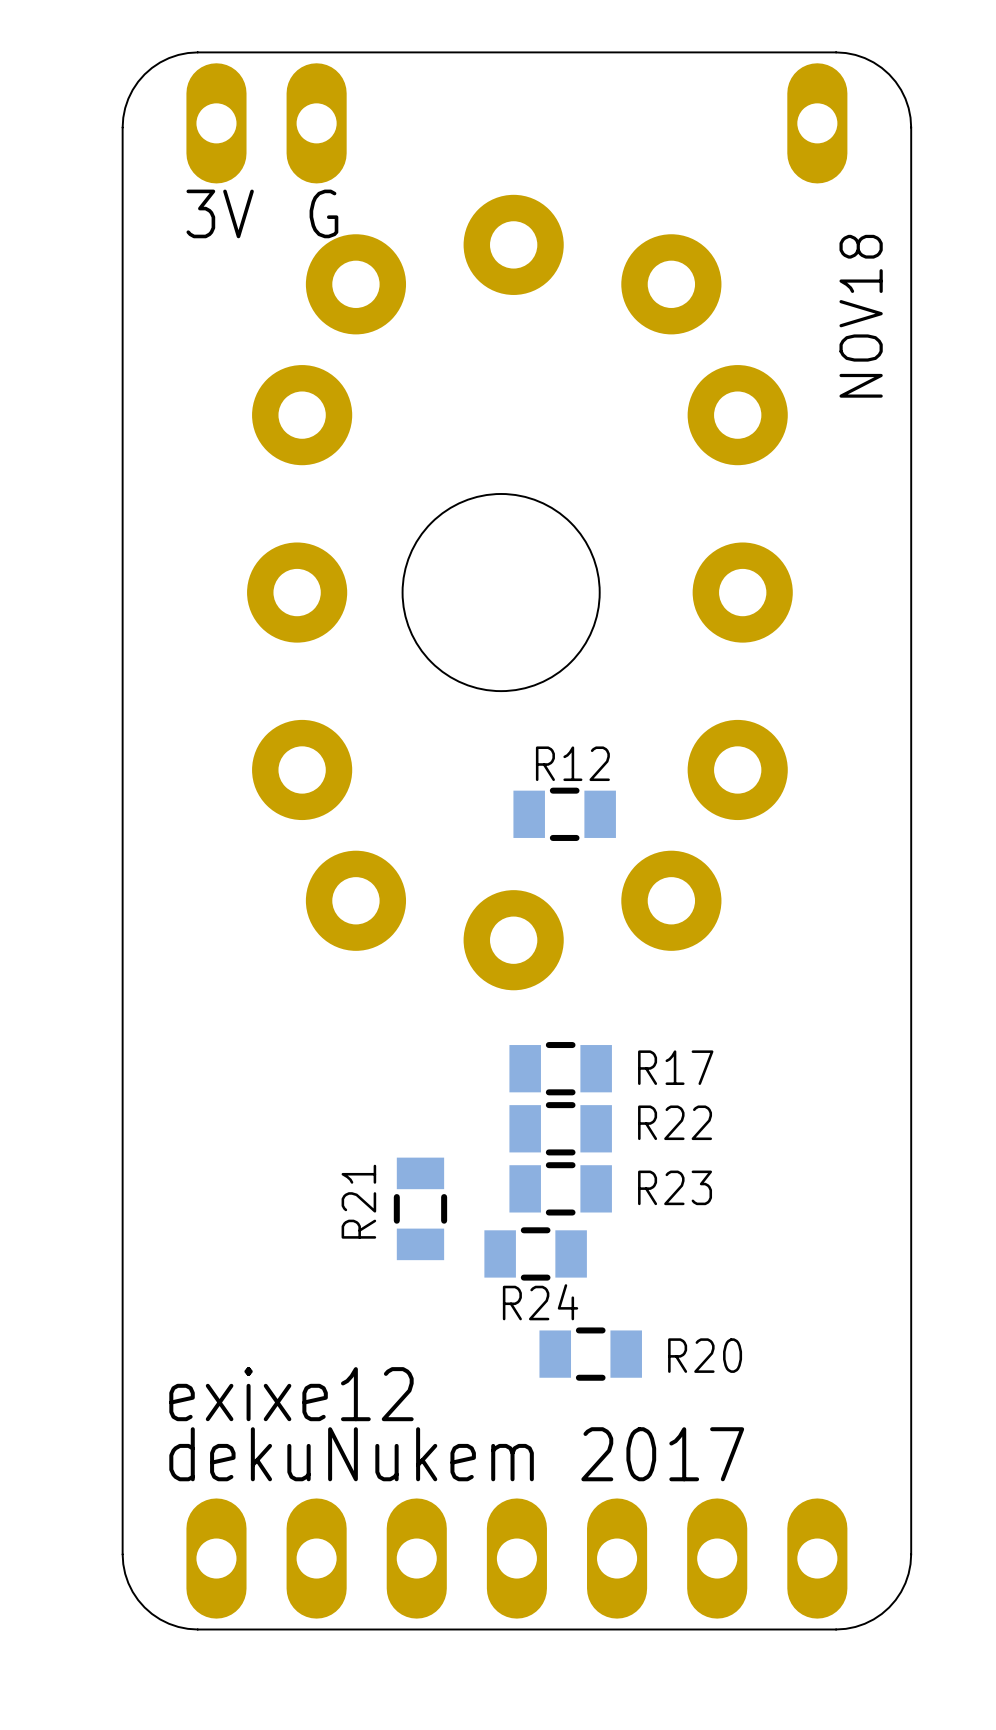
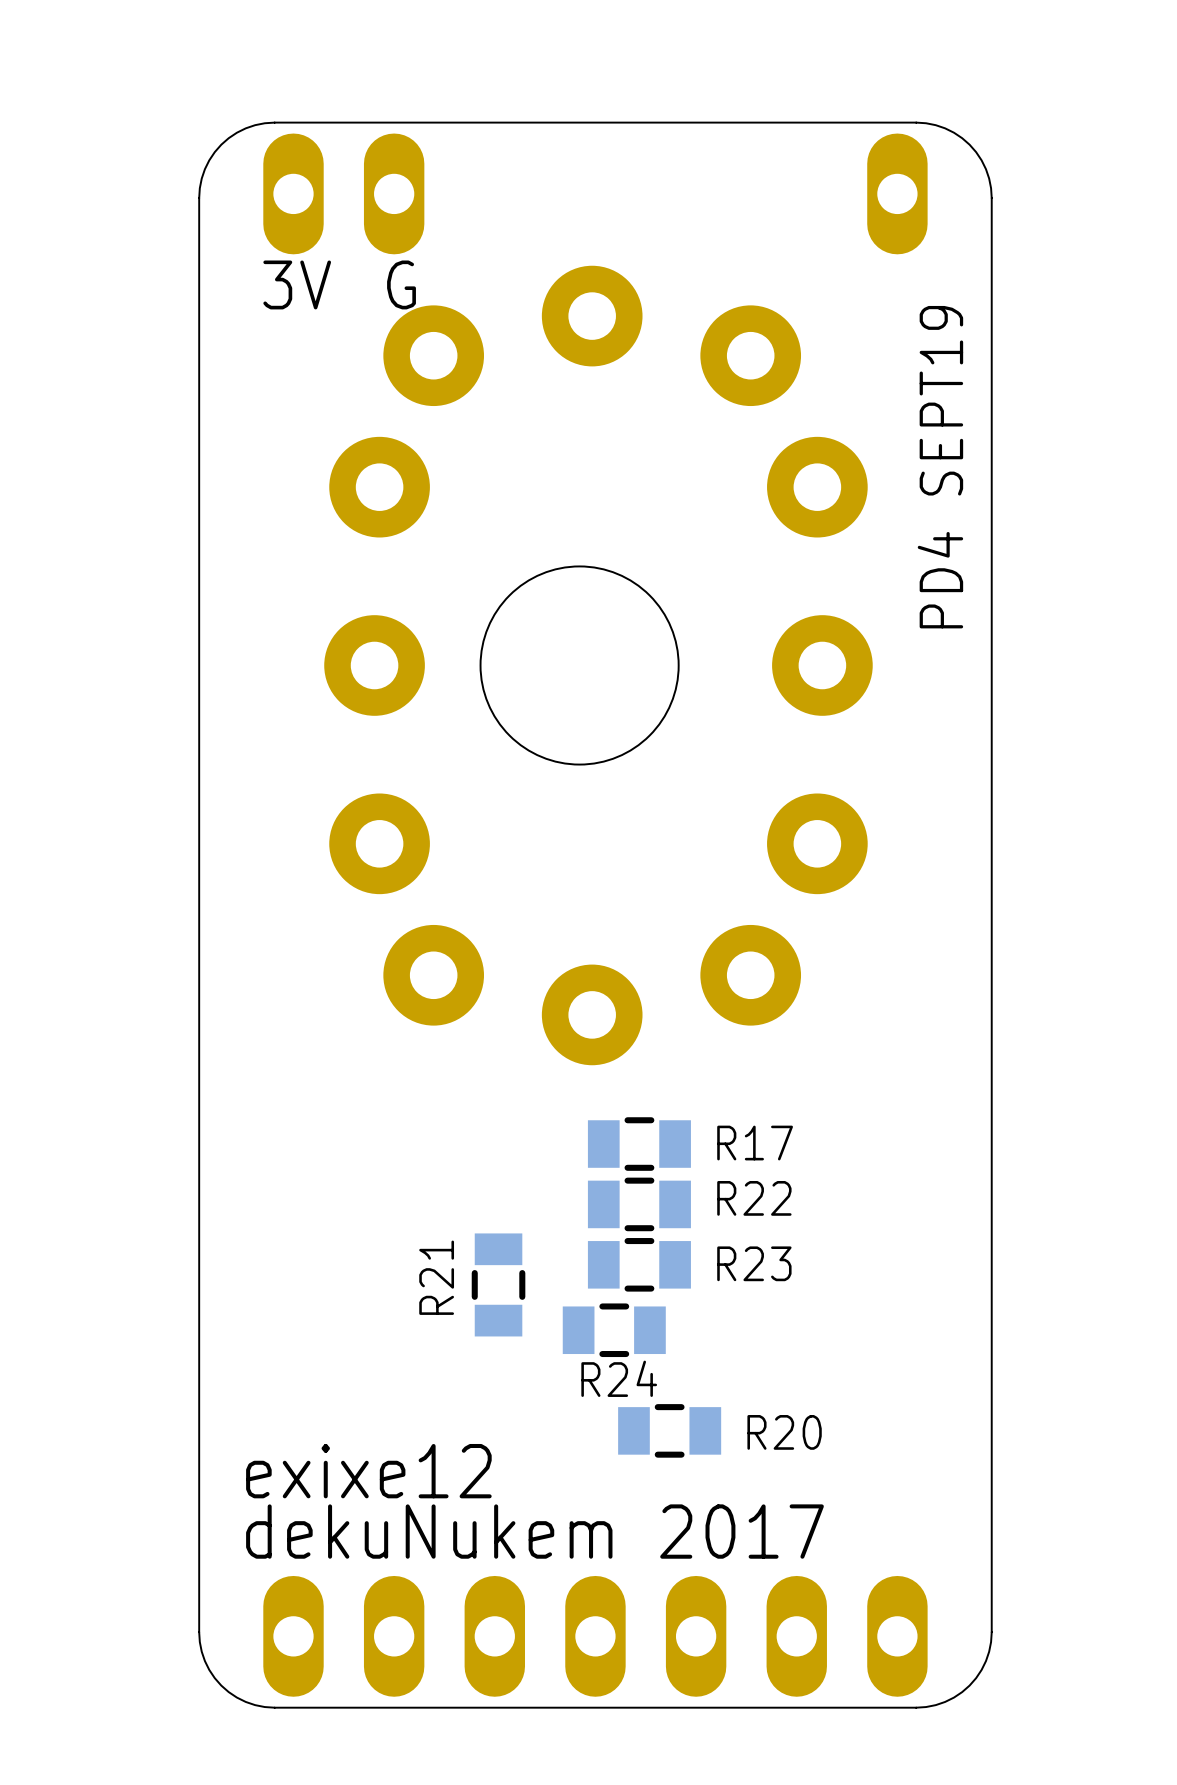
text: NOV18 (861, 316) -> PD4 SEPT19 (940, 467)
R12: (564, 814) -> none

